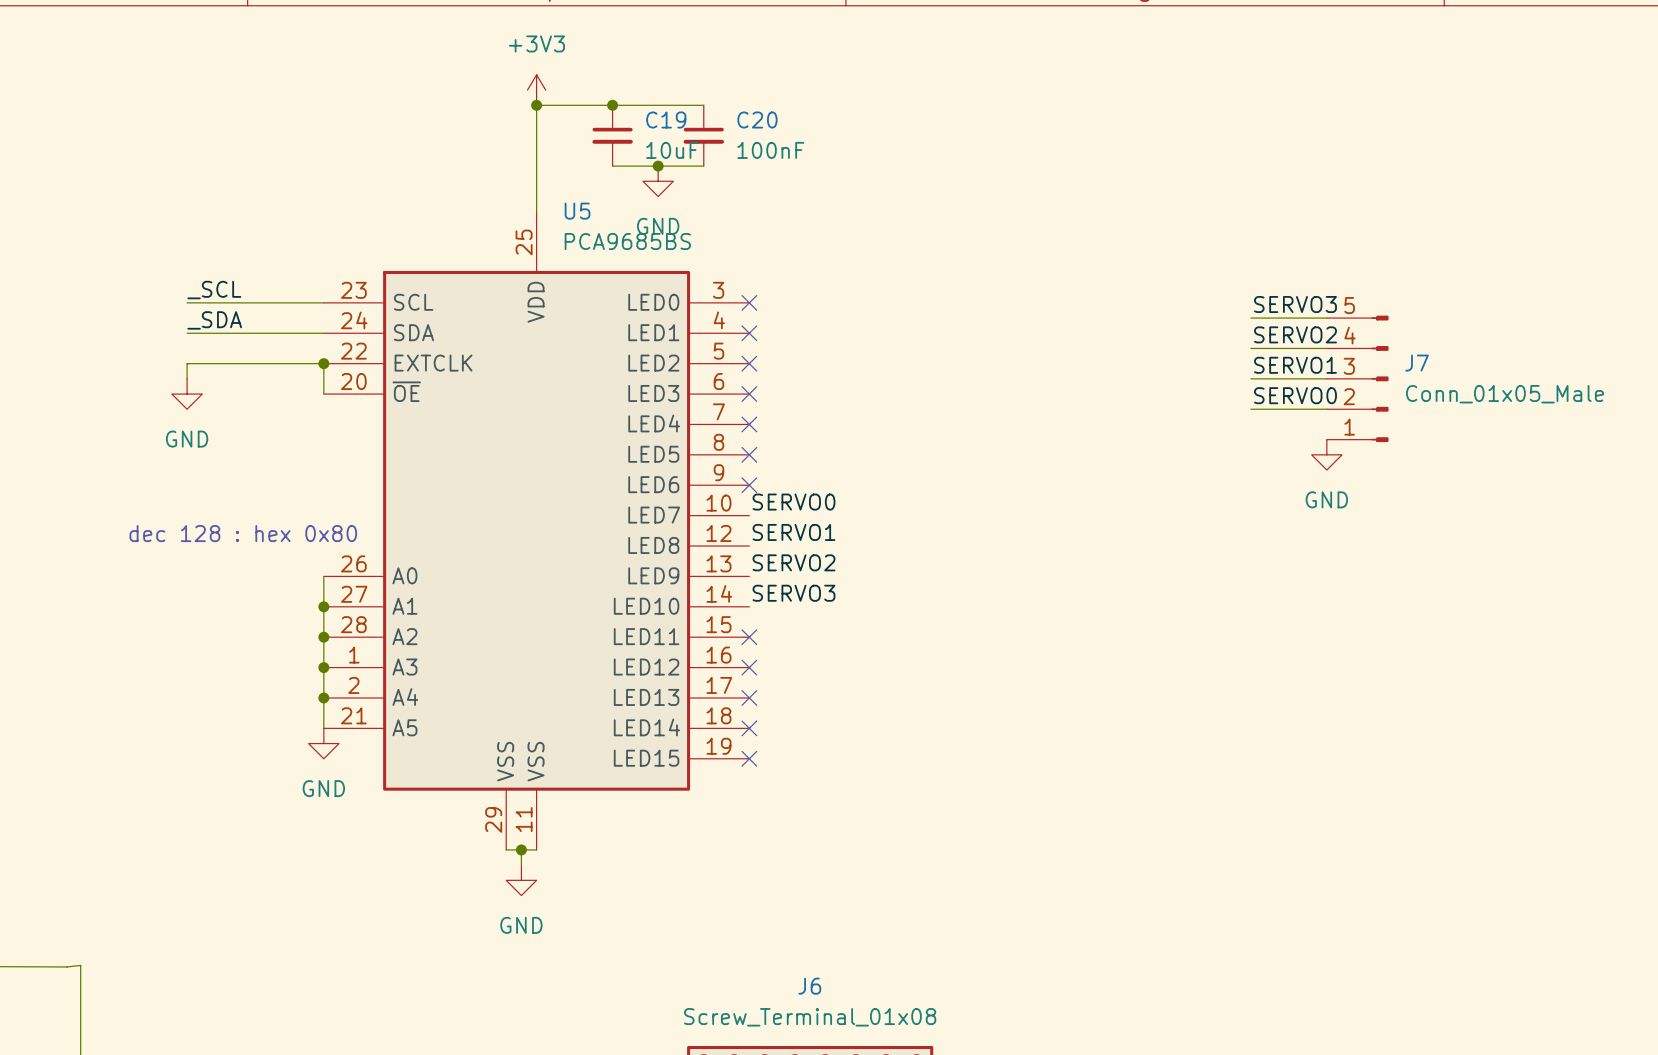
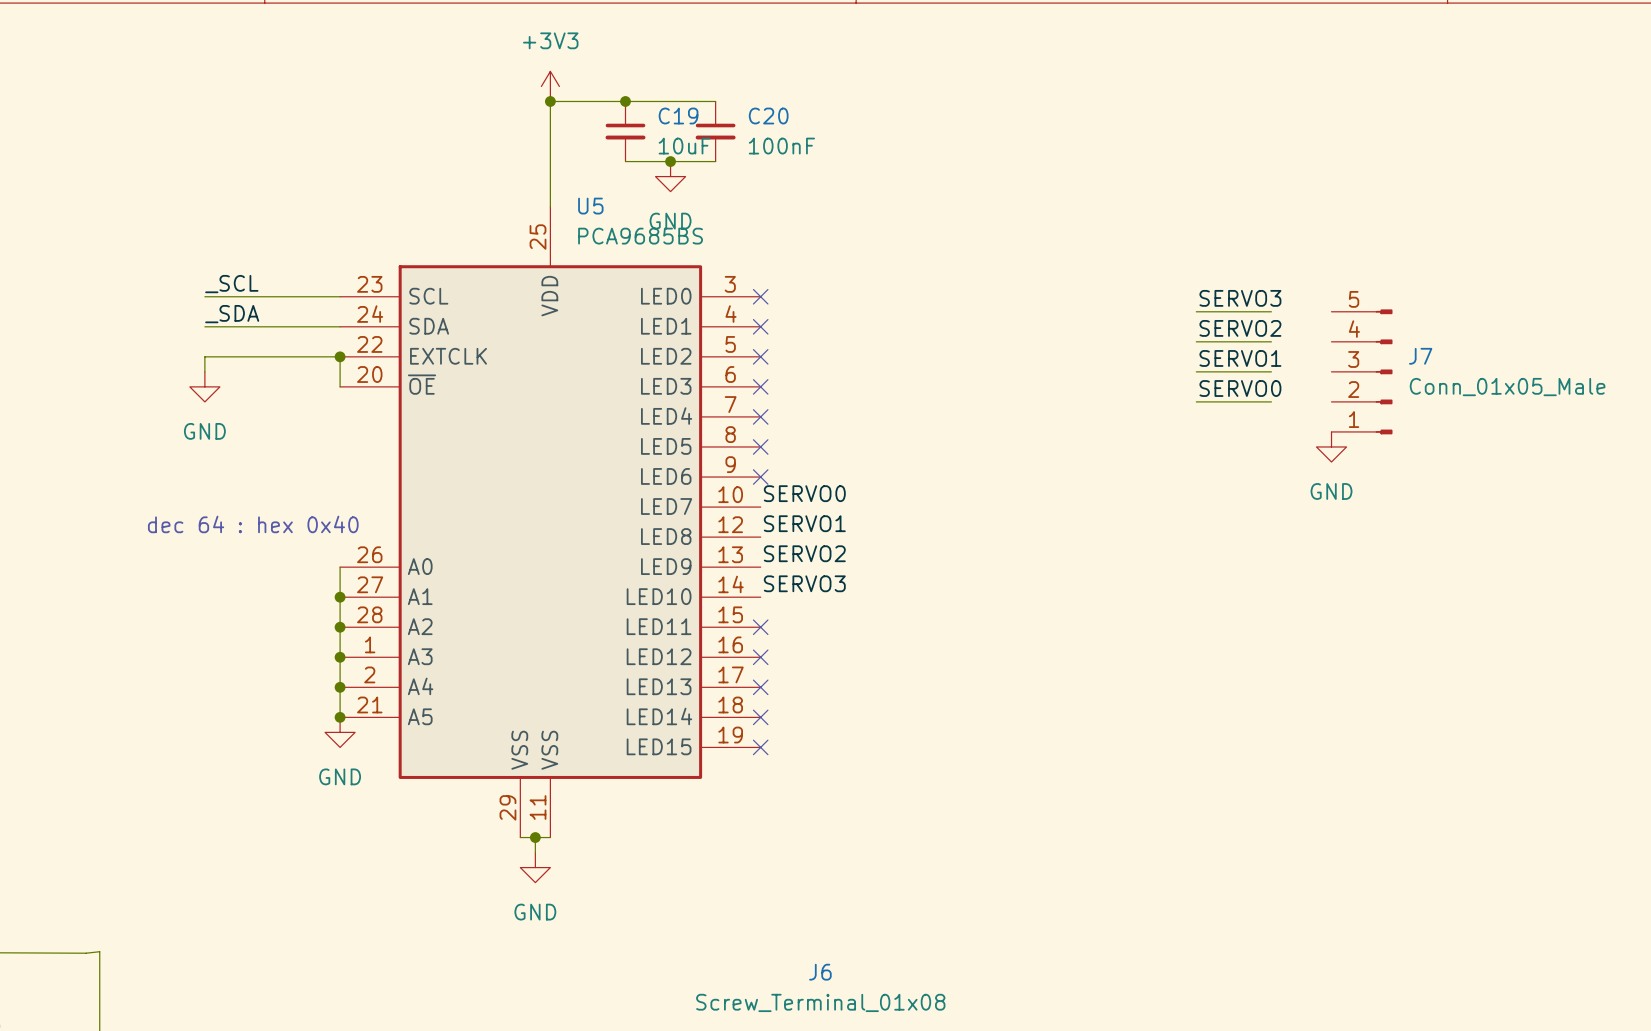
label position: SERVO3 (1295, 304) -> SERVO3 (1240, 298)
wire: (1266, 318) (1326, 318) -> (1196, 311) (1256, 311)
label position: SERVO2 (1295, 334) -> SERVO2 (1240, 328)
wire: (1266, 348) (1326, 348) -> (1196, 341) (1256, 341)
label position: SERVO1 (1295, 365) -> SERVO1 (1240, 358)
wire: (1266, 378) (1326, 378) -> (1196, 371) (1256, 371)
label position: SERVO0 (1295, 395) -> SERVO0 (1240, 388)
wire: (1266, 409) (1326, 409) -> (1196, 401) (1256, 401)
text: dec 128 : hex 0x80 (243, 533) -> dec 64 : hex 0x40 (253, 524)
junction: none -> (340, 717)

